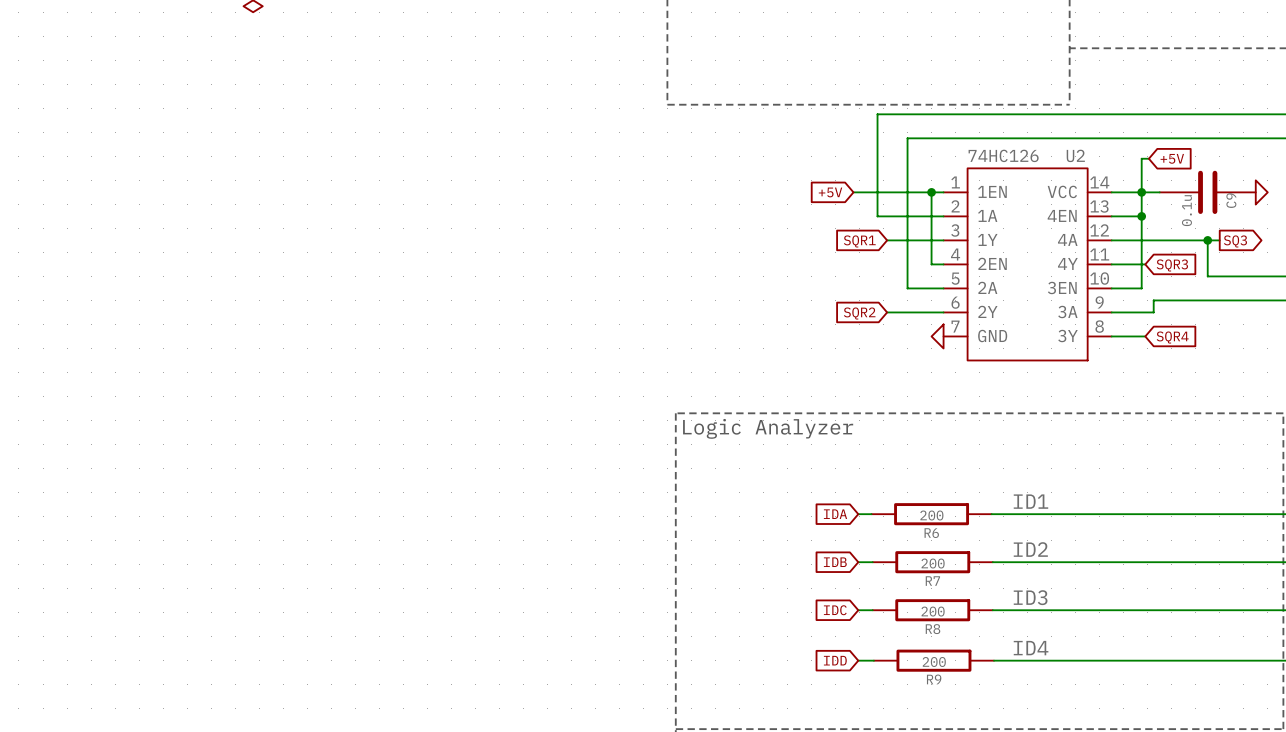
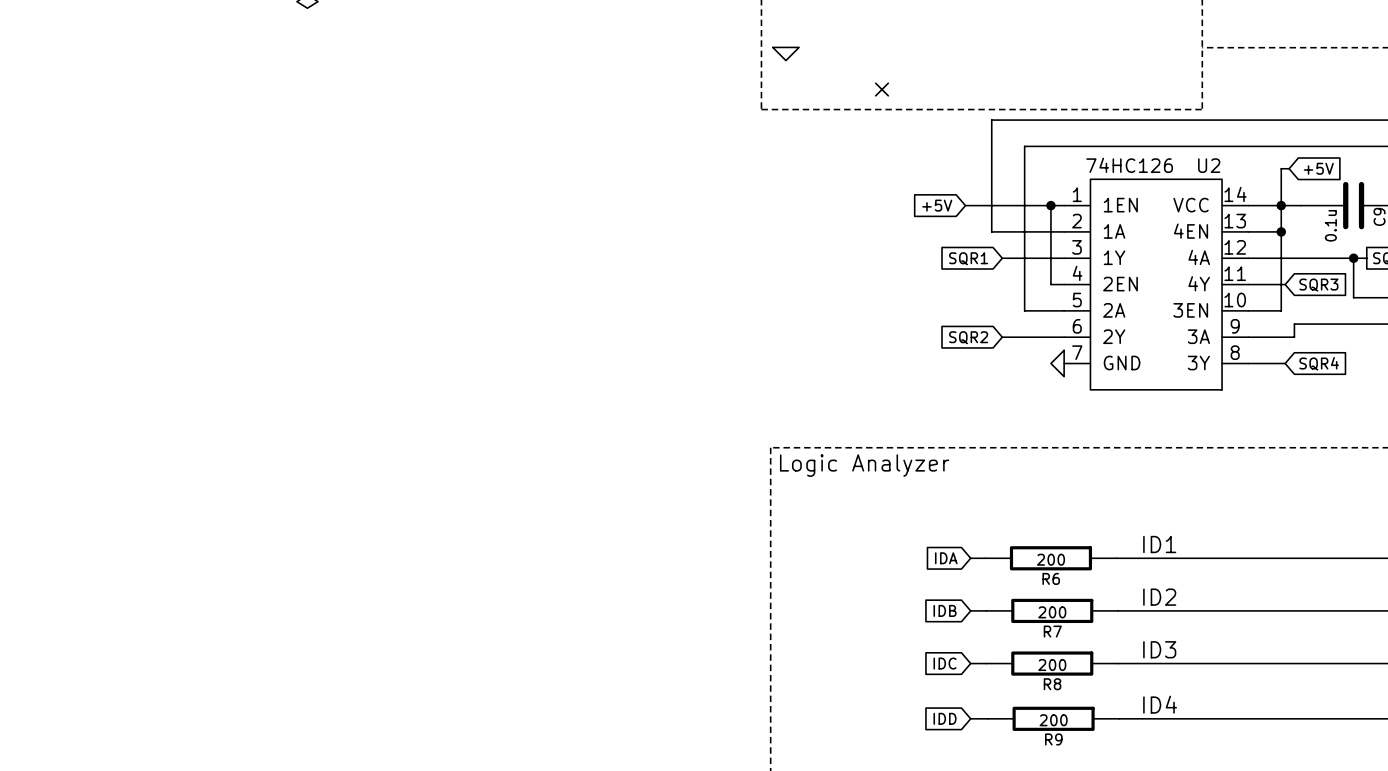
power symbol: none -> (785, 54)
no-connect mark: none -> (882, 89)

